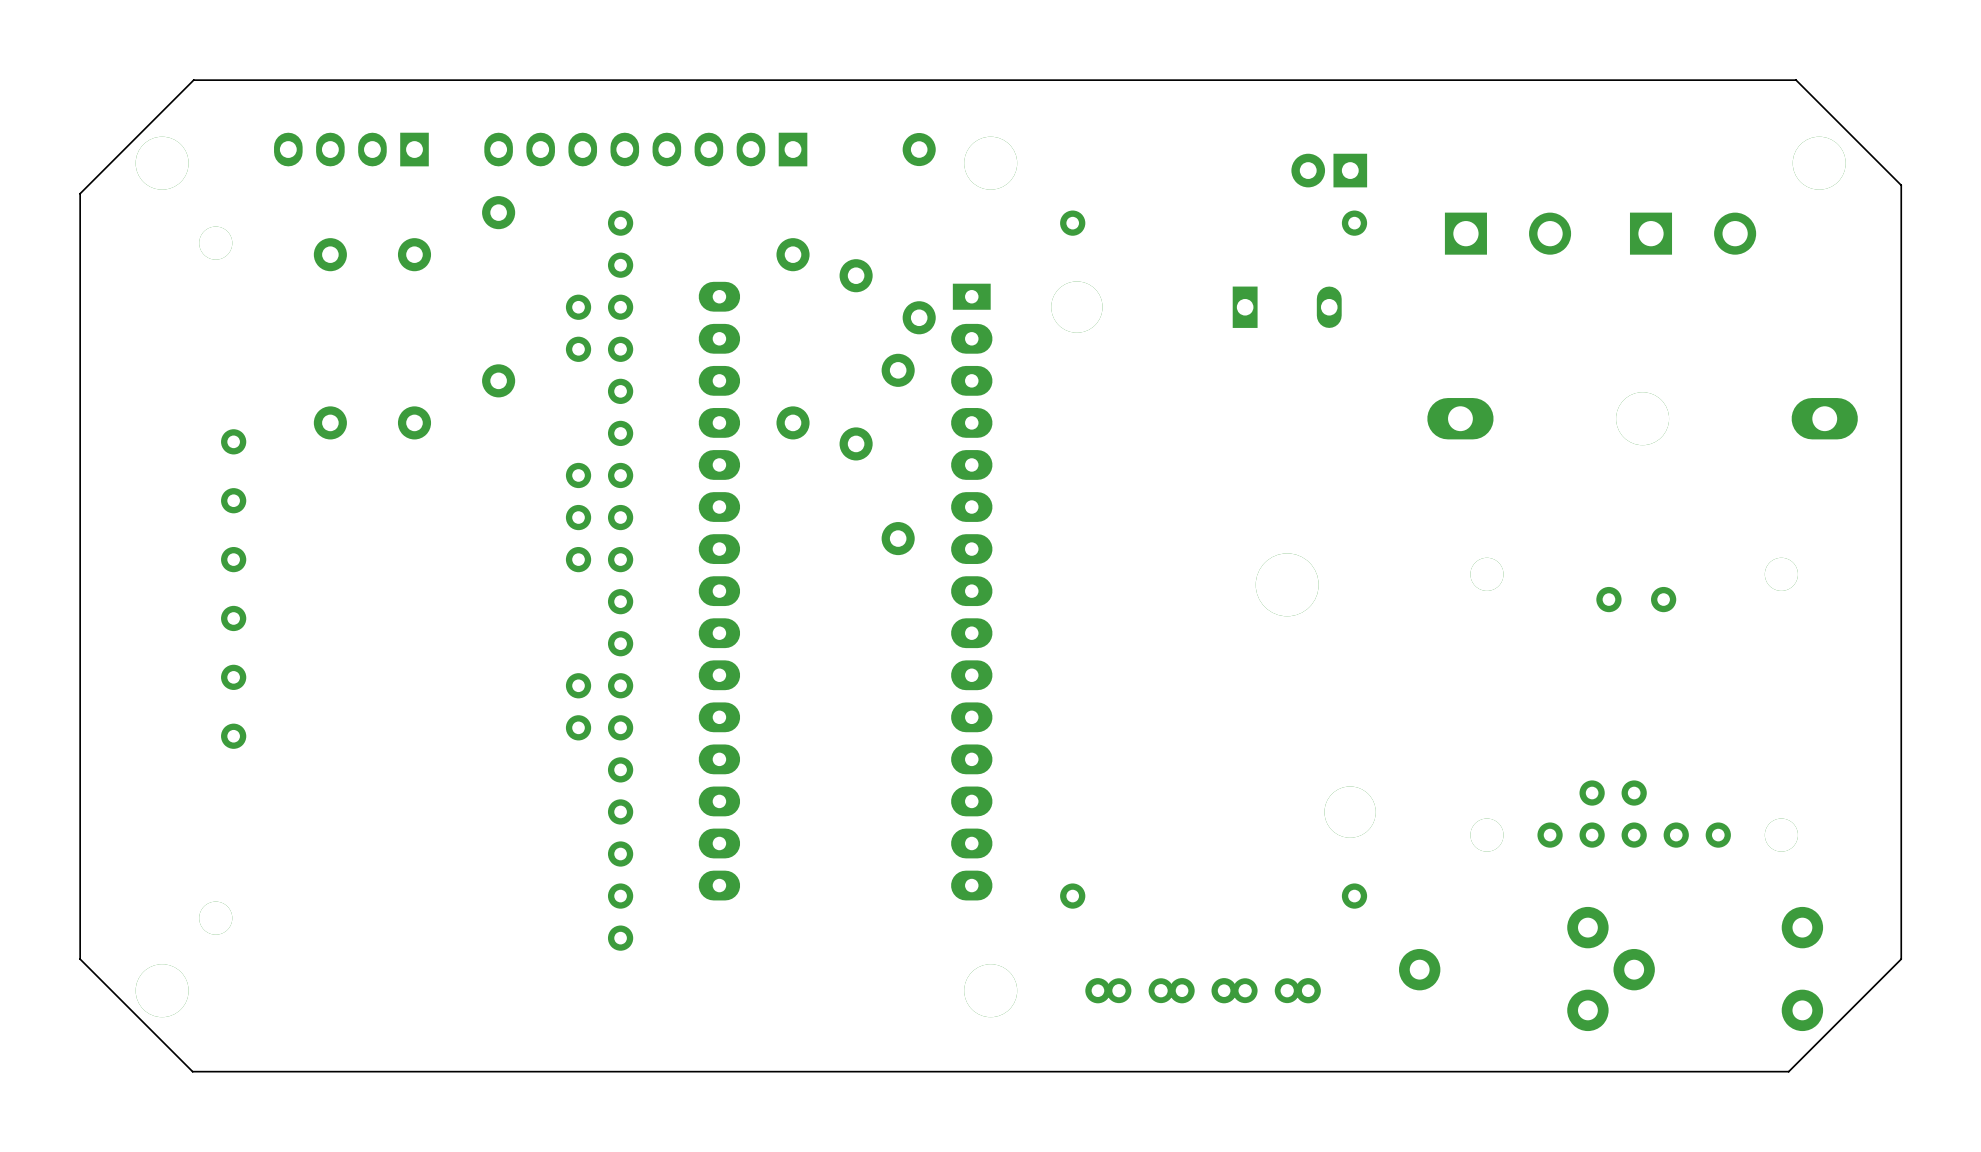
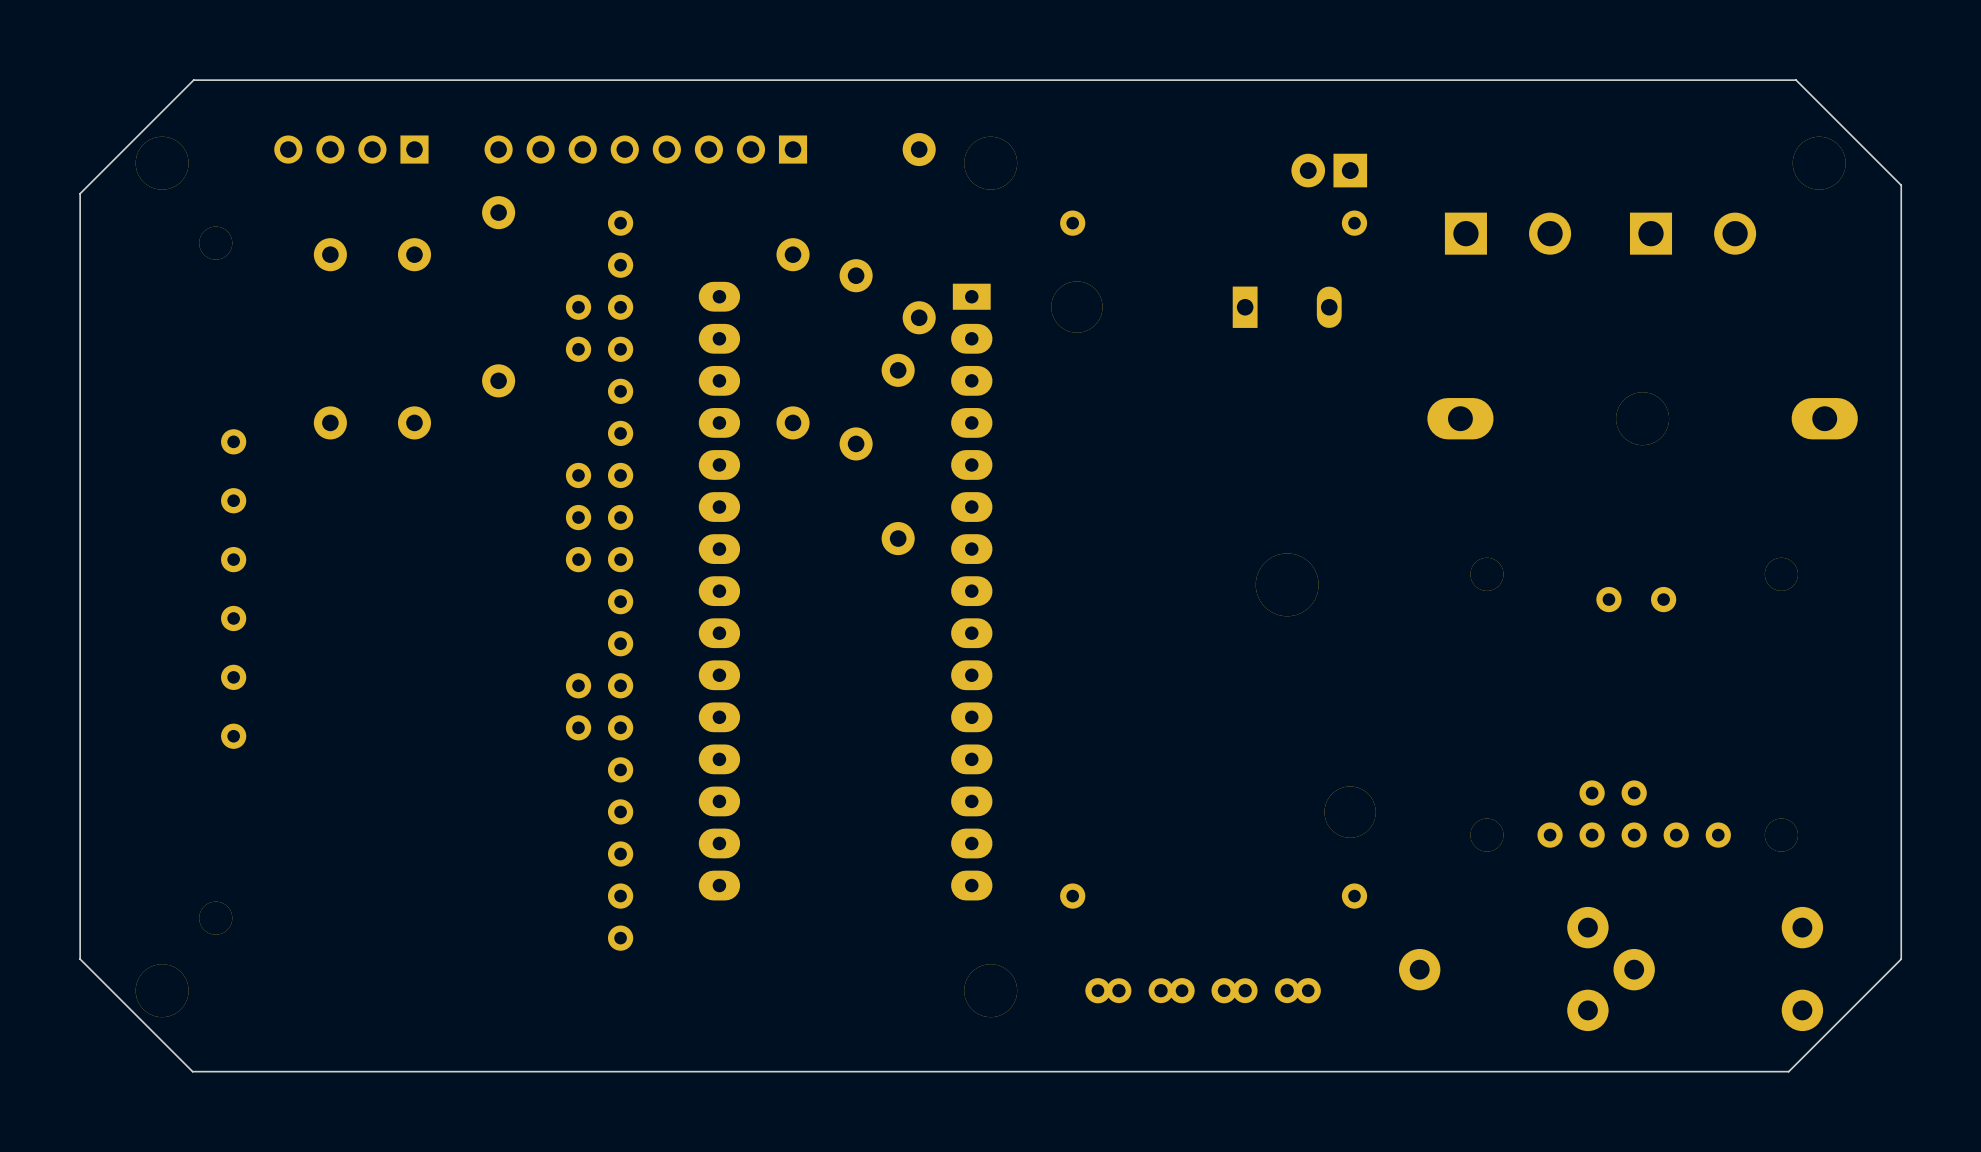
part footprint: [274, 132, 429, 167] -> [274, 135, 429, 164]
part footprint: [484, 132, 808, 167] -> [484, 135, 808, 164]

